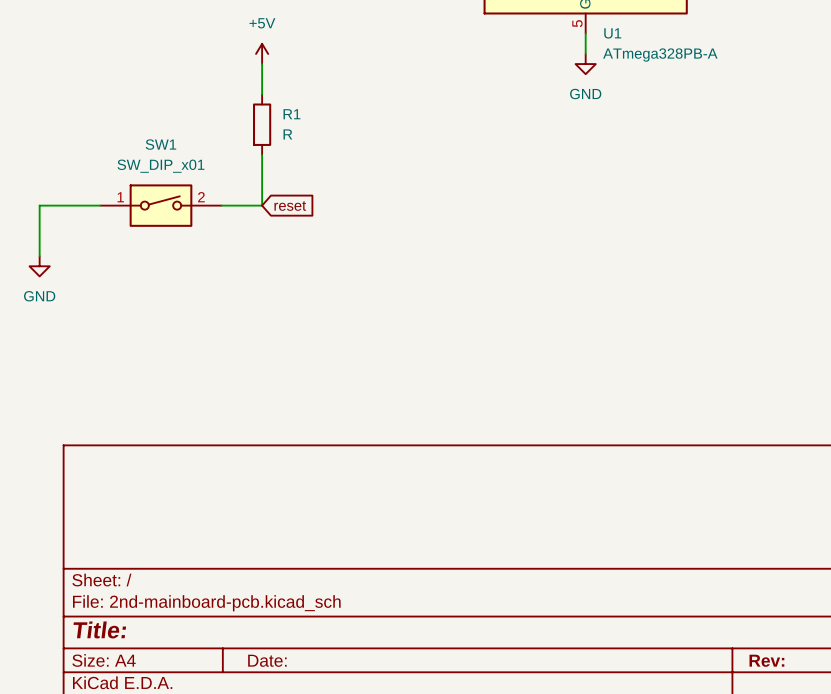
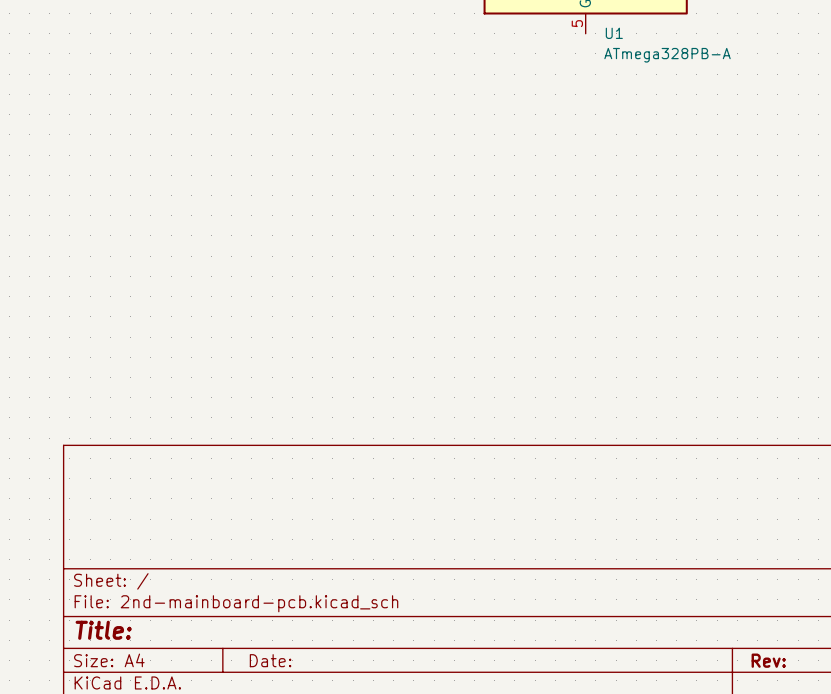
wire: (585, 33) (585, 53) -> none
power symbol: +5V (262, 53) -> none
wire: (262, 64) (262, 94) -> none
power symbol: GND (585, 64) -> none
R1: R (262, 124) -> none
wire: (262, 155) (262, 205) (221, 205) -> none
wire: (100, 205) (39, 205) (39, 256) -> none
SW1: SW_DIP_x01 (160, 205) -> none
global label: reset (290, 205) -> none
power symbol: GND (39, 266) -> none

